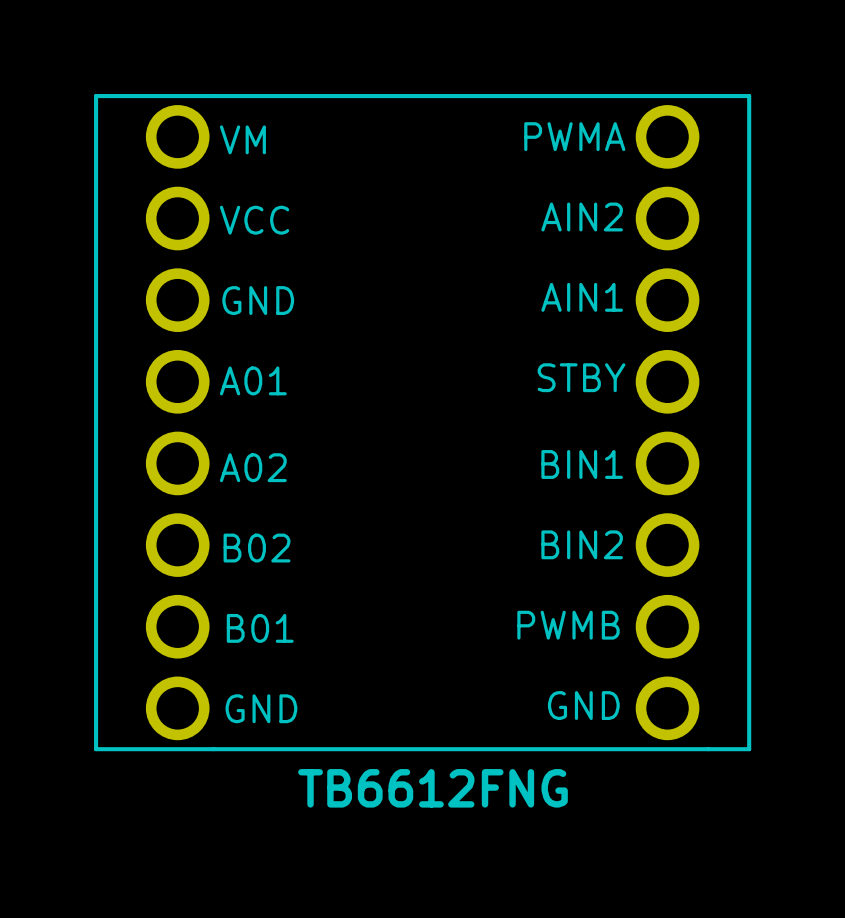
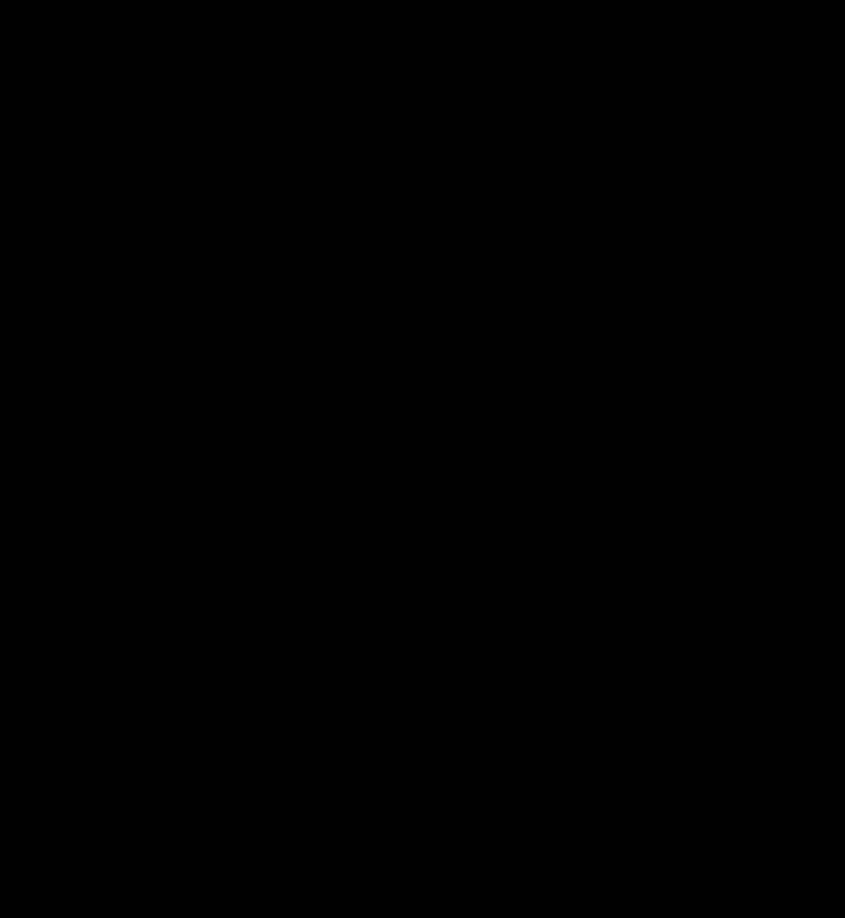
part: (422, 422) -> none

